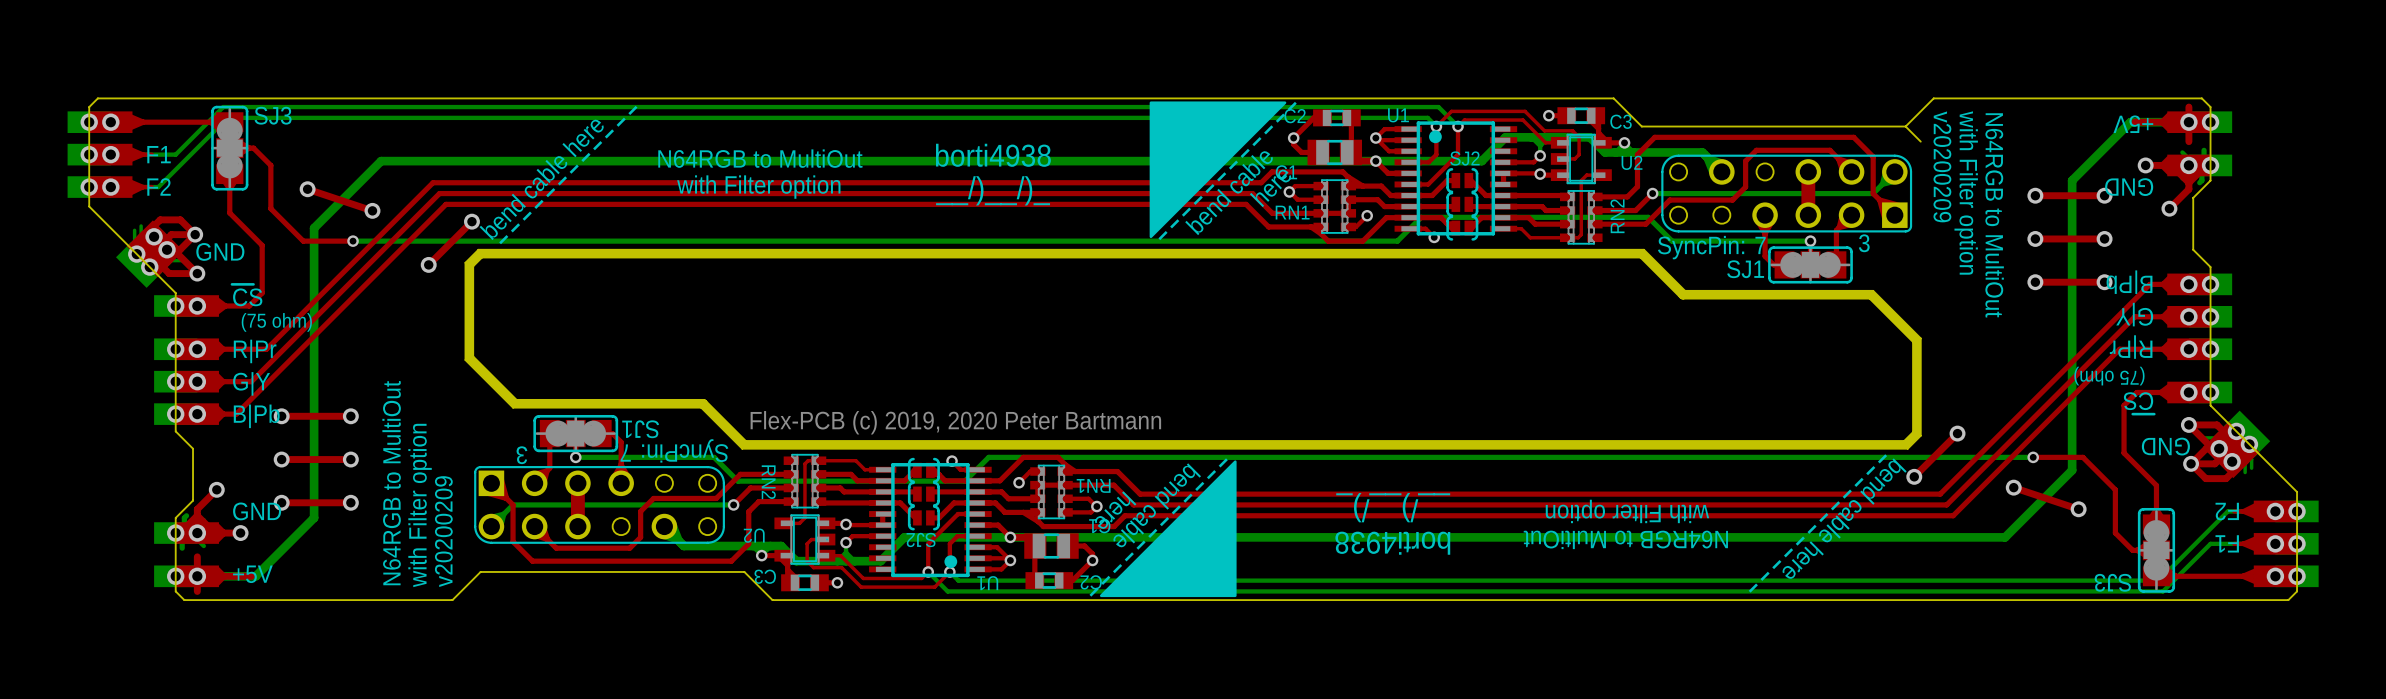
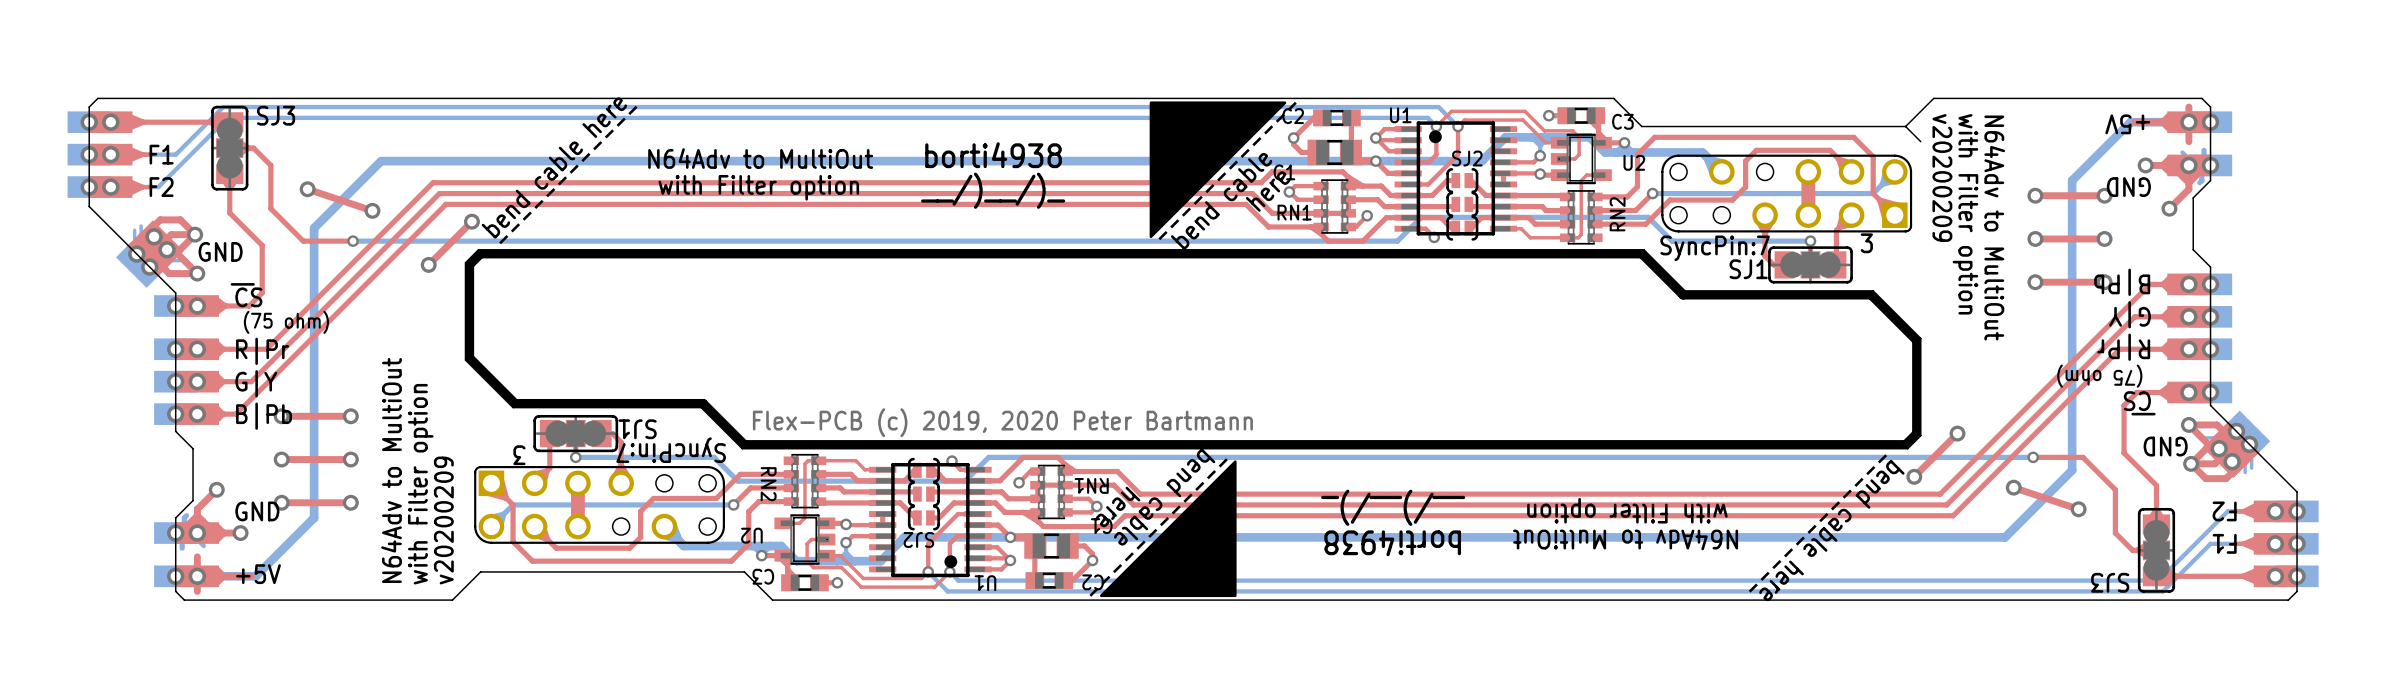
text: N64RGB to MultiOut (760, 158) -> N64Adv to MultiOut (760, 158)
text: N64RGB to MultiOut (1994, 215) -> N64Adv to MultiOut (1994, 228)
text: N64RGB to MultiOut (391, 483) -> N64Adv to MultiOut (391, 470)
text: N64RGB to MultiOut (1625, 539) -> N64Adv to MultiOut (1625, 539)

